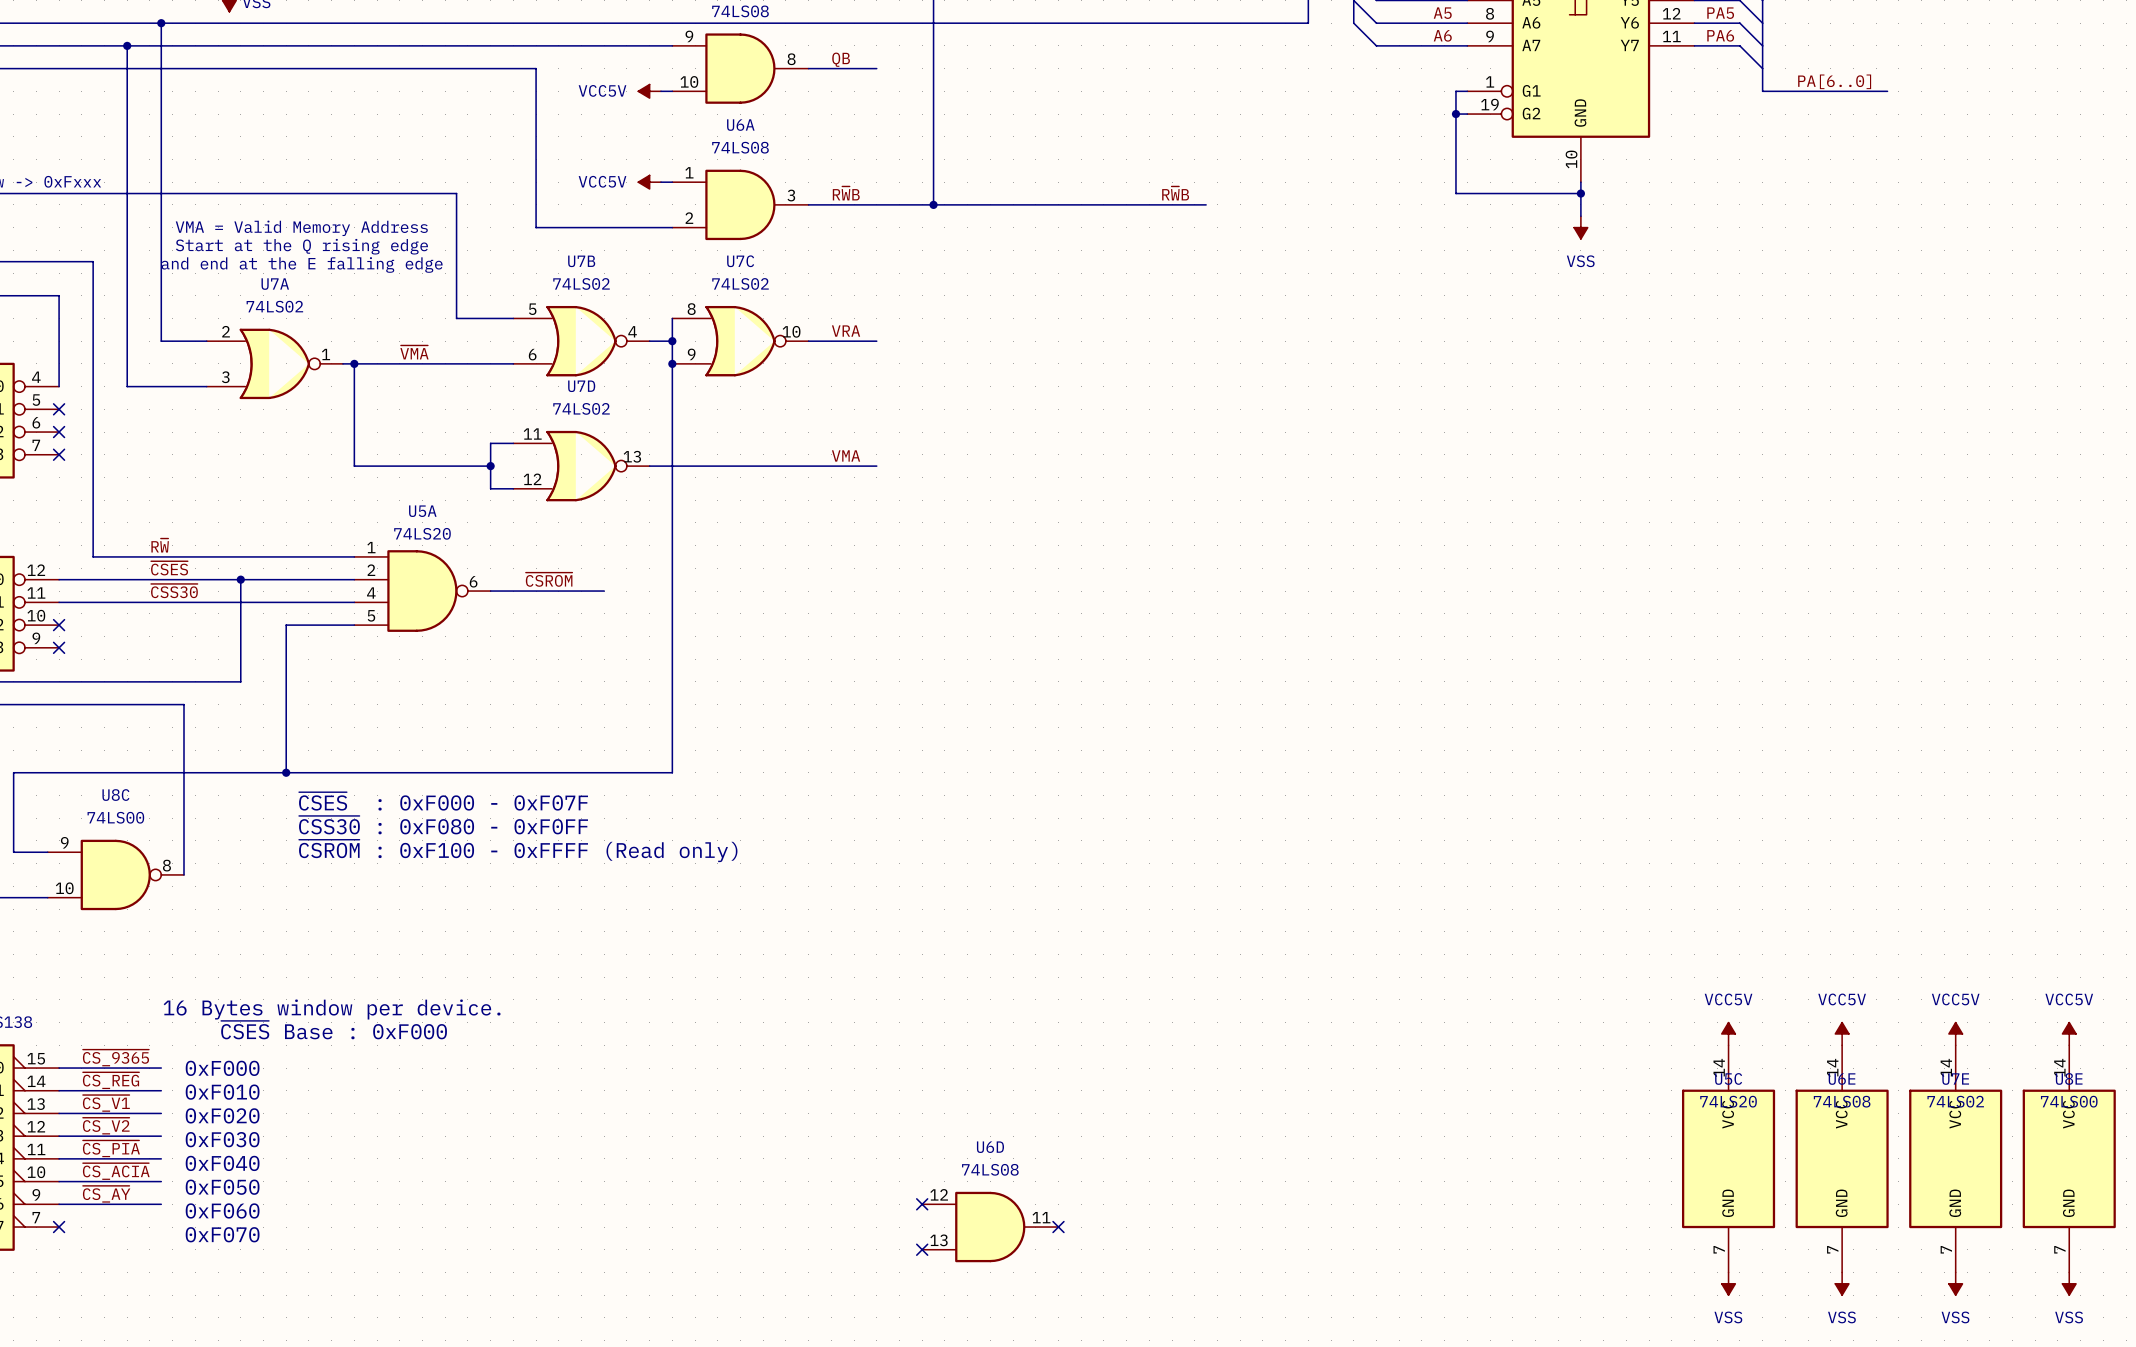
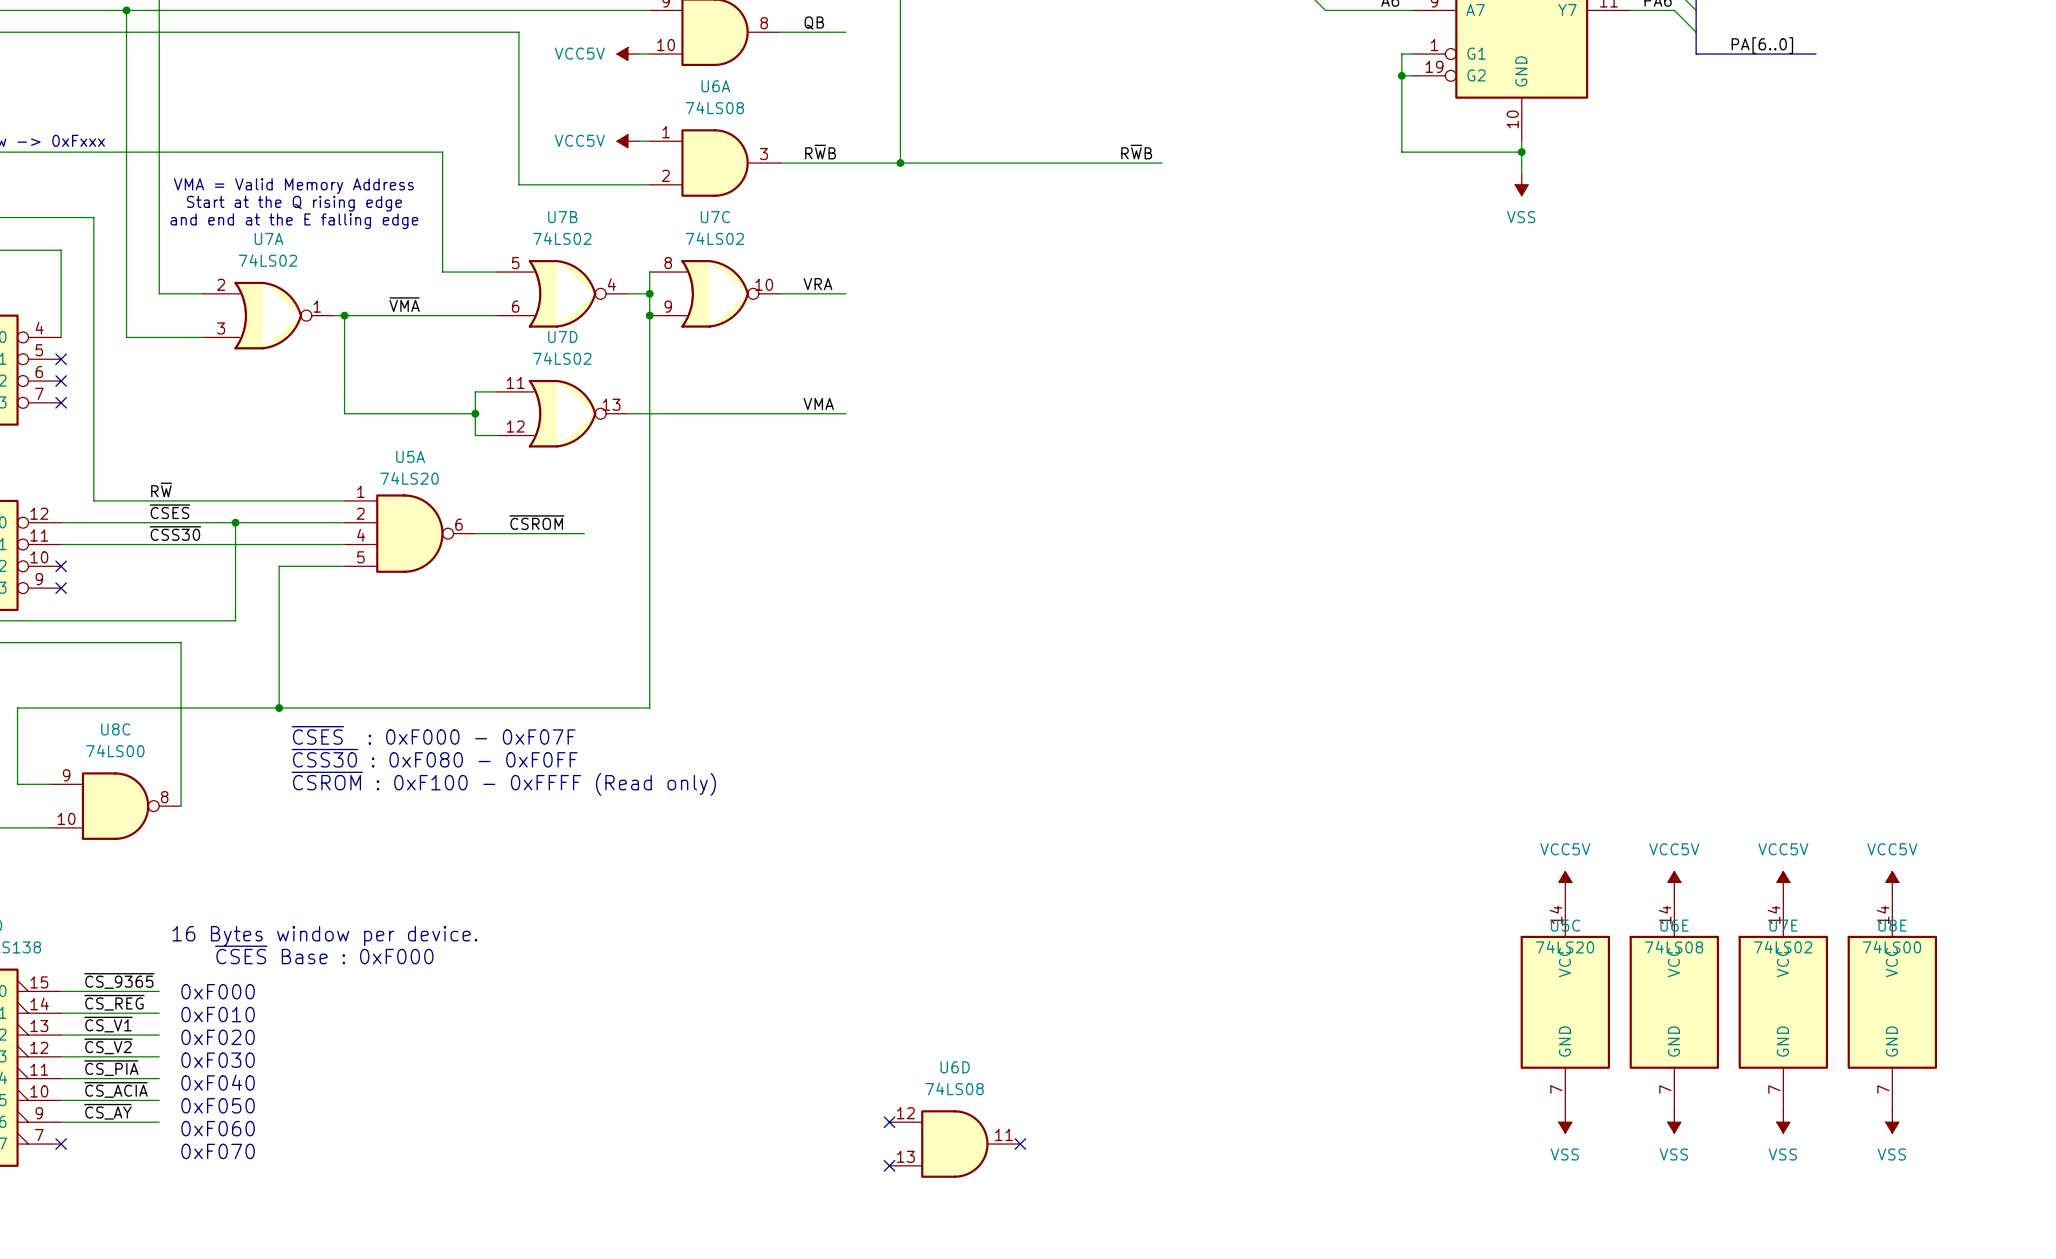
power symbol: none -> VCC5V (1565, 882)
power symbol: none -> VCC5V (1674, 882)
power symbol: none -> VCC5V (1783, 882)
power symbol: none -> VCC5V (1892, 882)
power symbol: VCC5V (1728, 1033) -> none
power symbol: VCC5V (1842, 1033) -> none
power symbol: VCC5V (1955, 1033) -> none
power symbol: VCC5V (2069, 1033) -> none
U5C position: (1728, 1158) -> (1565, 1002)
U6E position: (1842, 1158) -> (1674, 1002)
U7E position: (1955, 1158) -> (1783, 1002)
U8E position: (2069, 1158) -> (1892, 1002)
power symbol: none -> VSS (1565, 1122)
power symbol: none -> VSS (1674, 1122)
power symbol: none -> VSS (1783, 1122)
power symbol: none -> VSS (1892, 1122)
power symbol: VSS (1728, 1283) -> none
power symbol: VSS (1842, 1283) -> none
power symbol: VSS (1955, 1283) -> none
power symbol: VSS (2069, 1283) -> none

